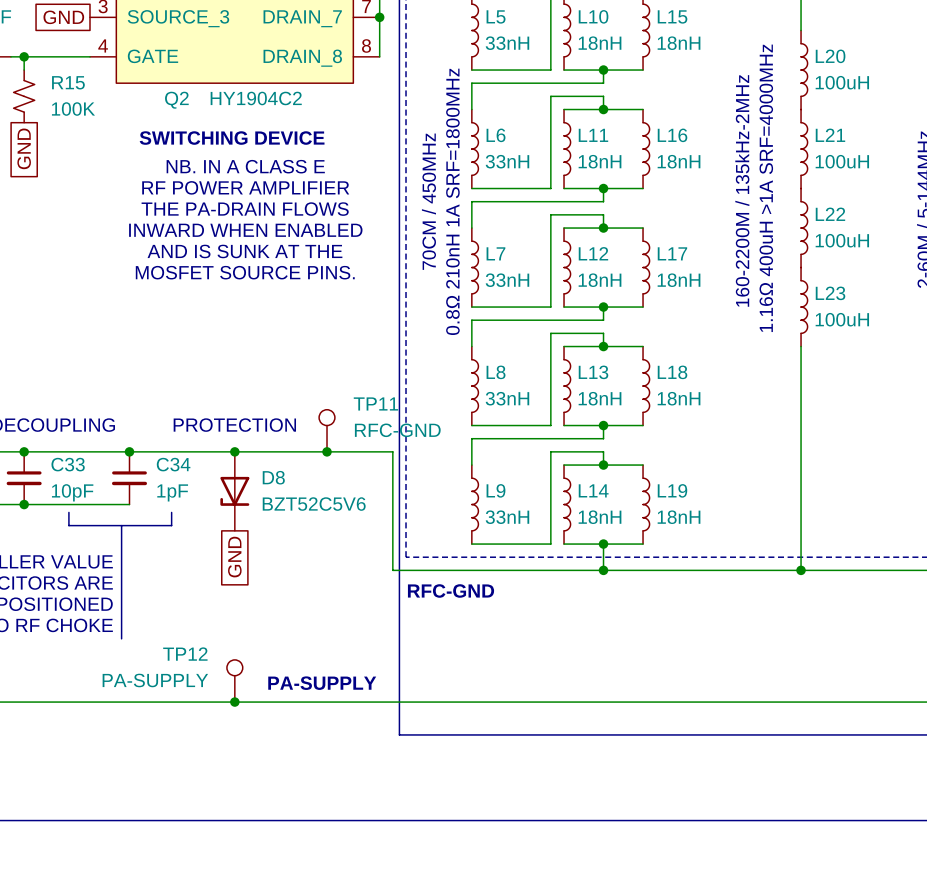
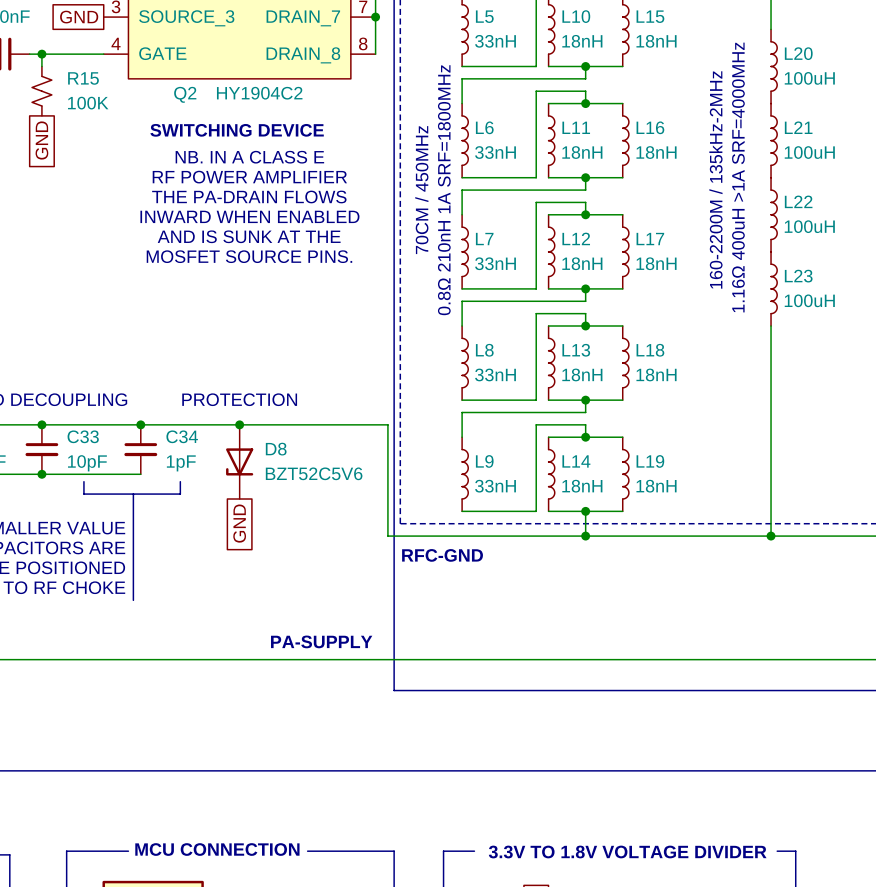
TP11: RFC-GND (327, 430) -> none
junction: (327, 451) -> none
TP12: PA-SUPPLY (234, 680) -> none
junction: (234, 702) -> none

